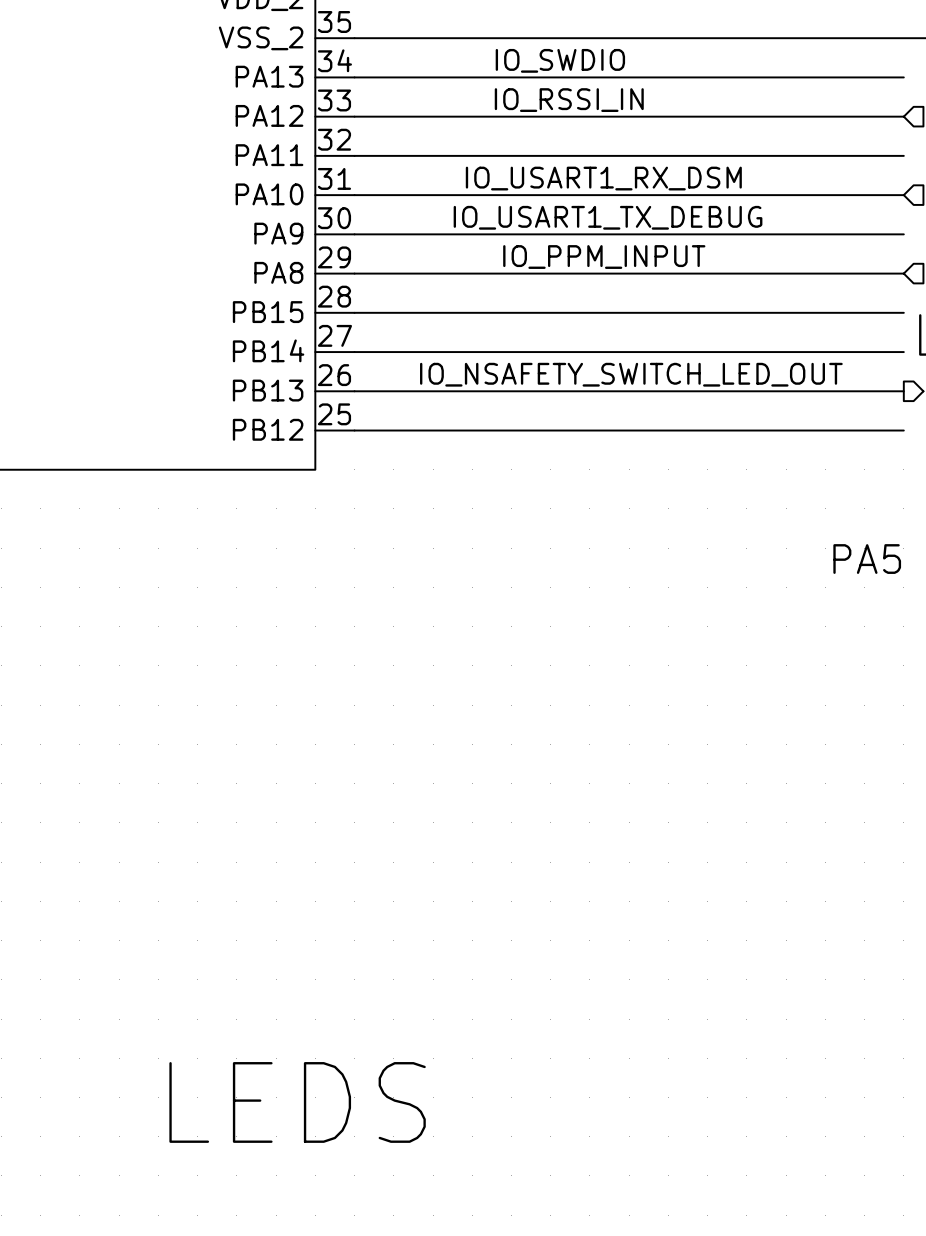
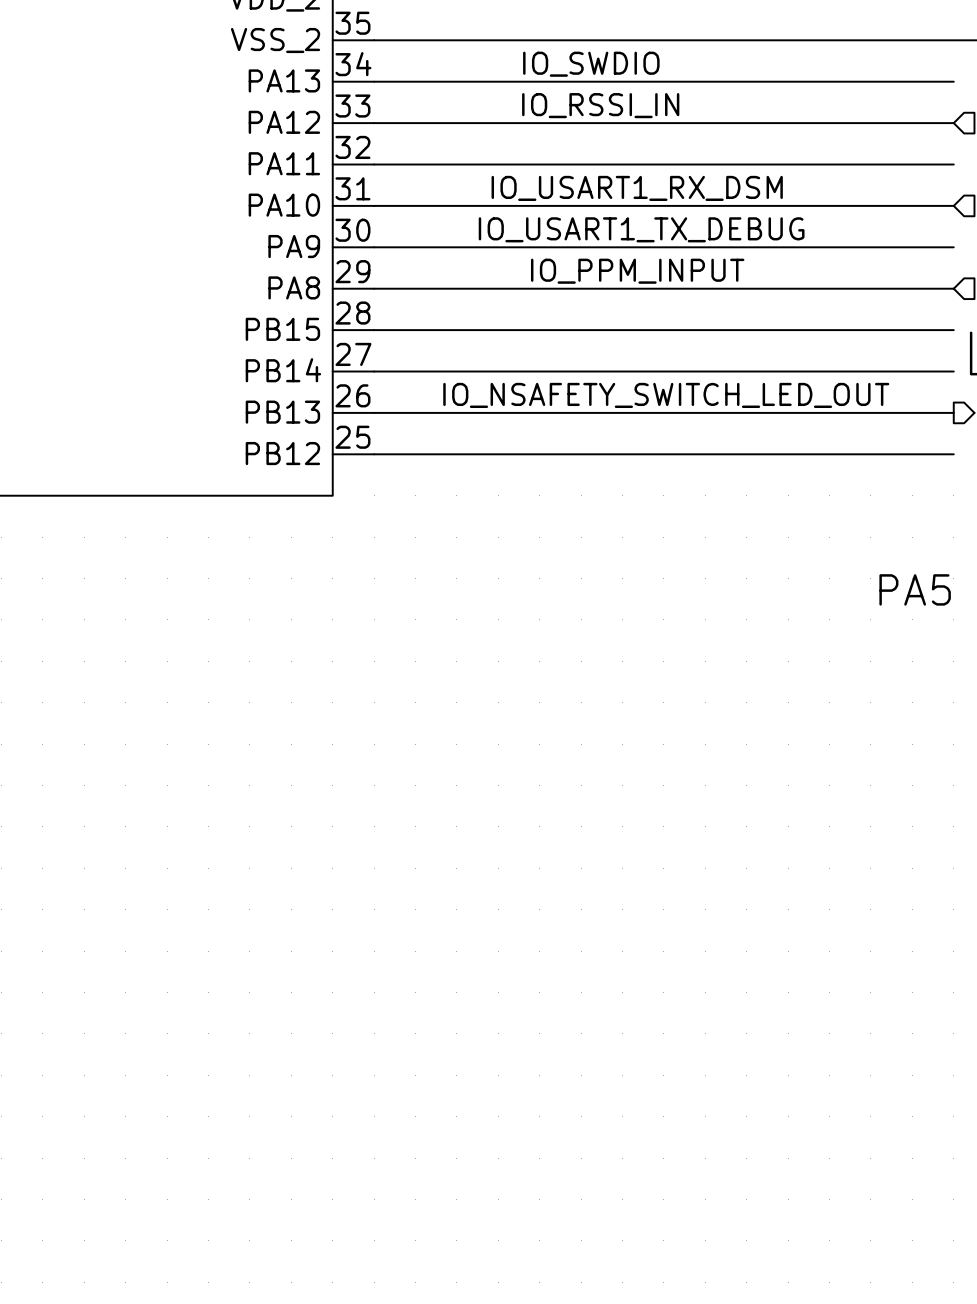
text: LEDS (297, 1102) -> none

